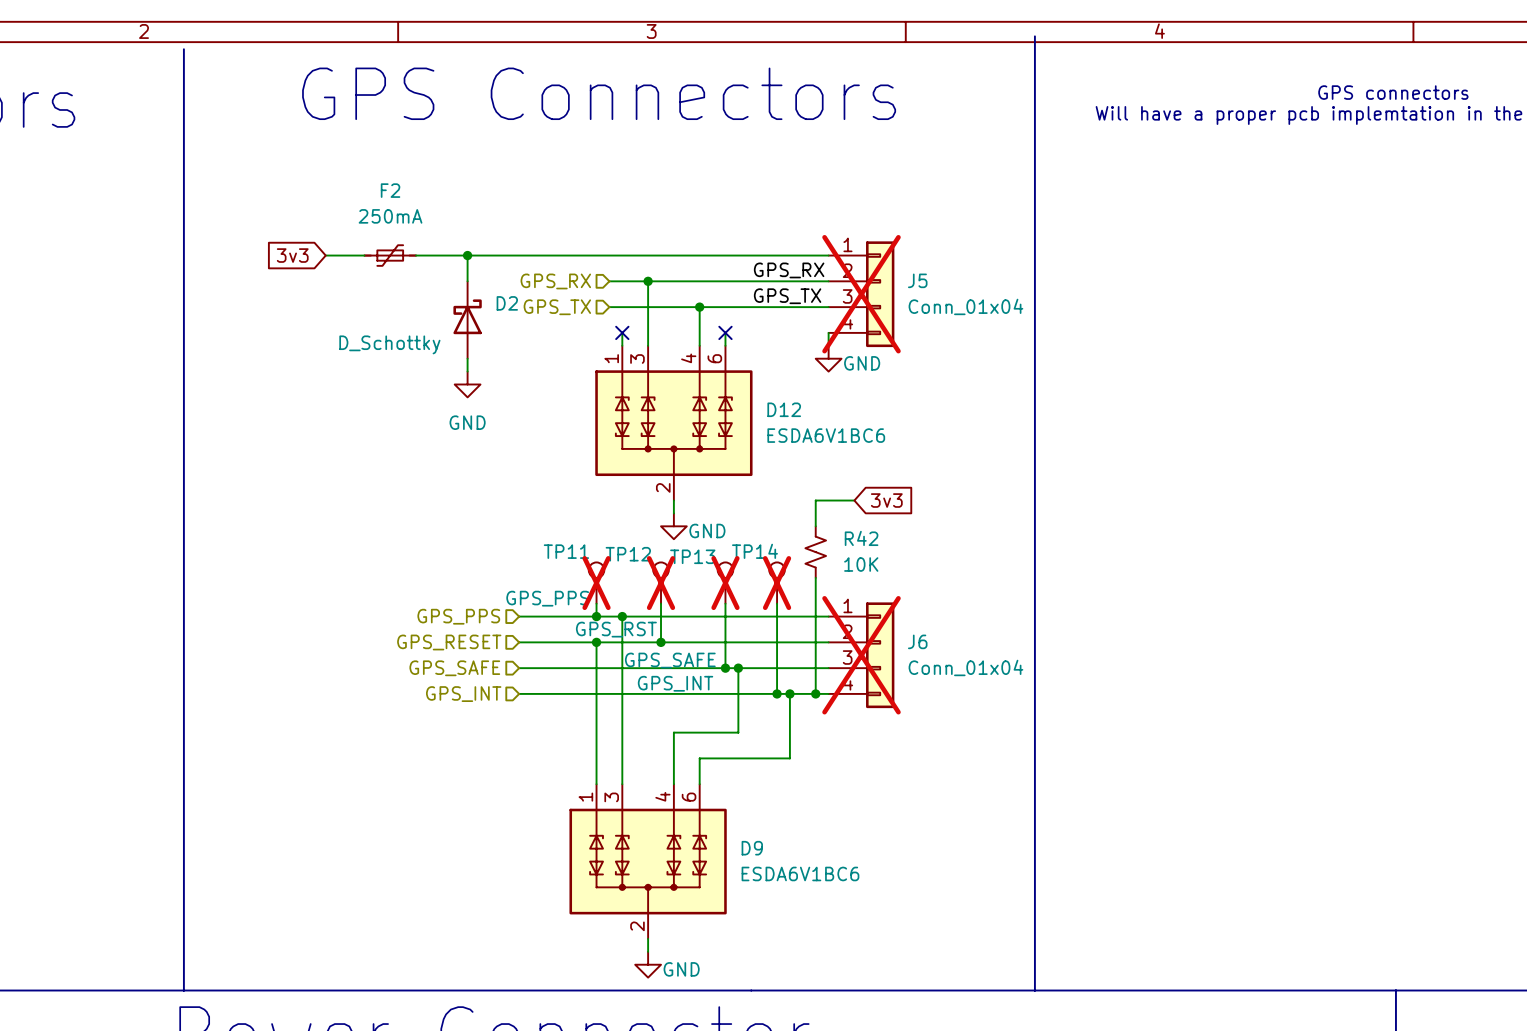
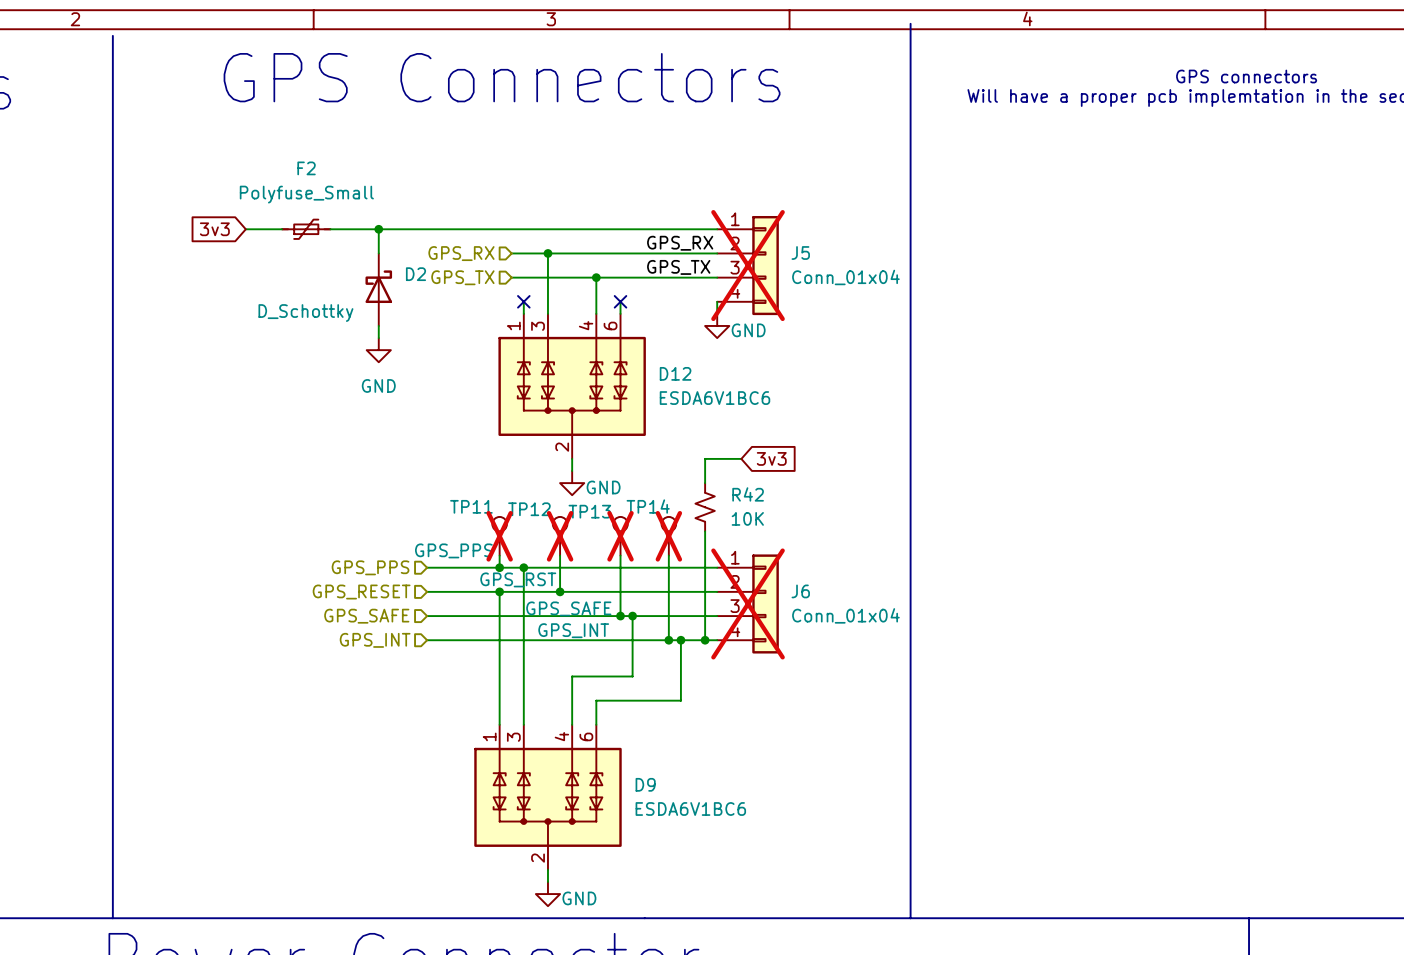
F2 value: 250mA (390, 216) -> Polyfuse_Small (306, 194)

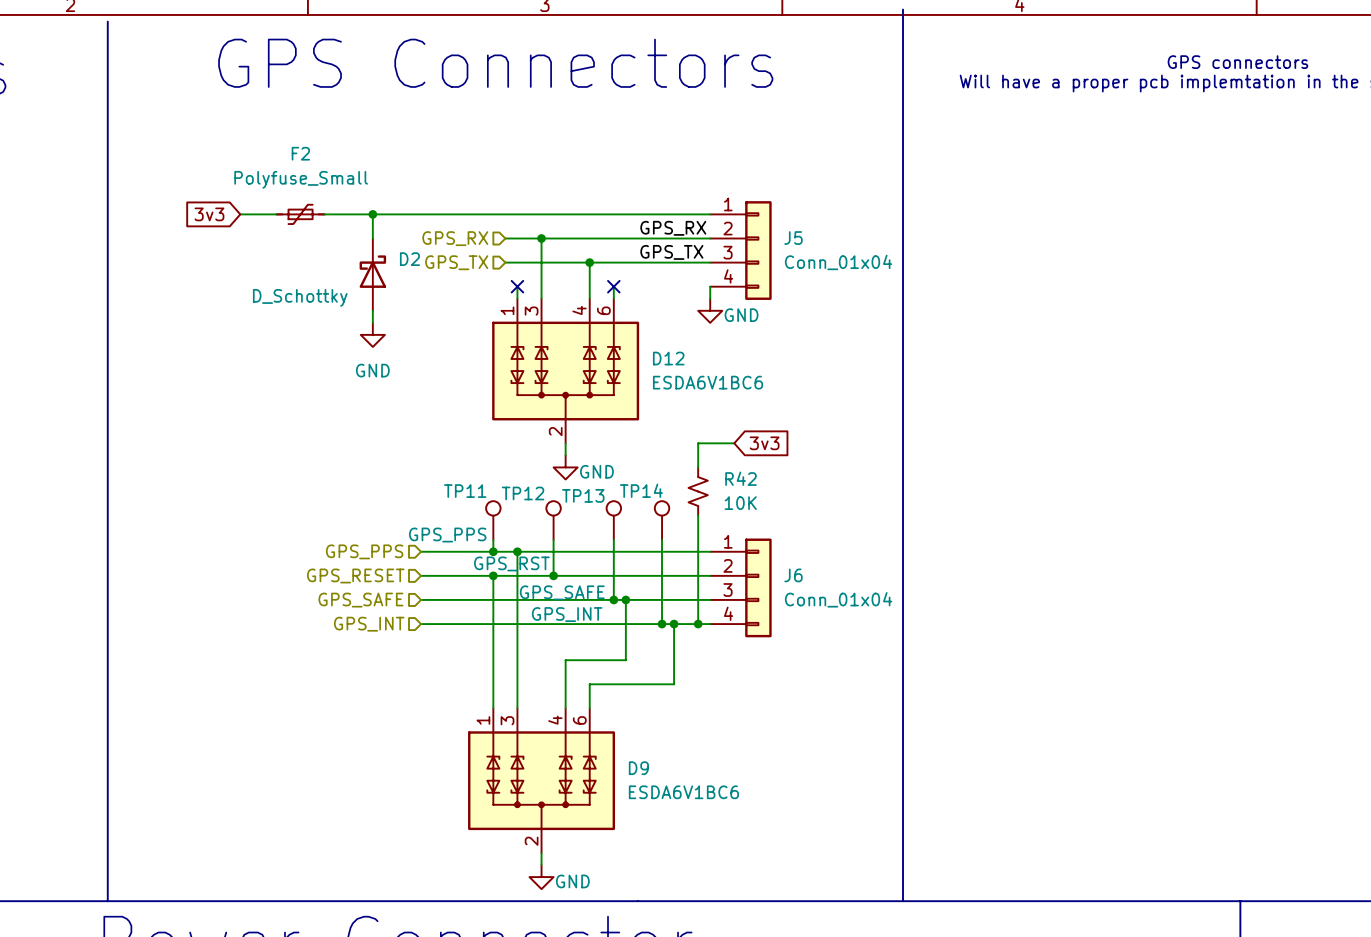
J5 do-not-place cross: (748, 265) -> none
TP11 do-not-place cross: (499, 536) -> none
TP12 do-not-place cross: (560, 536) -> none
TP13 do-not-place cross: (620, 536) -> none
TP14 do-not-place cross: (668, 536) -> none
J6 do-not-place cross: (748, 603) -> none

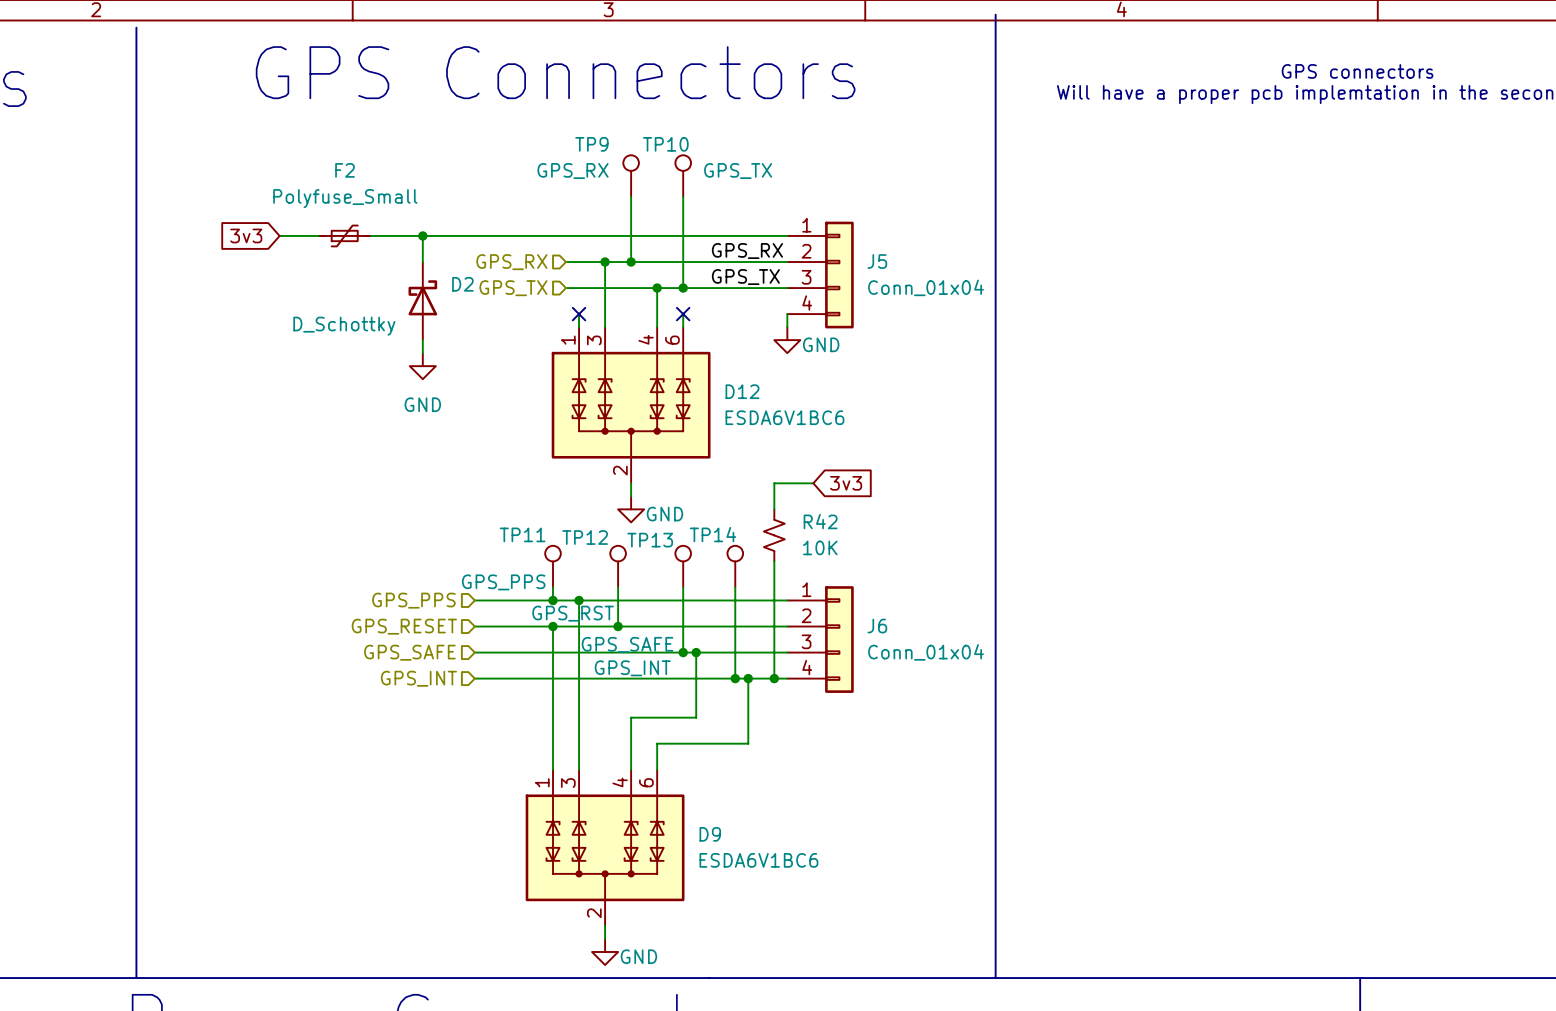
TP9: none -> GPS_RX (631, 176)
TP10: none -> GPS_TX (683, 176)
wire: none -> (631, 196) (631, 262)
wire: none -> (683, 196) (683, 288)
junction: none -> (631, 262)
junction: none -> (683, 288)

